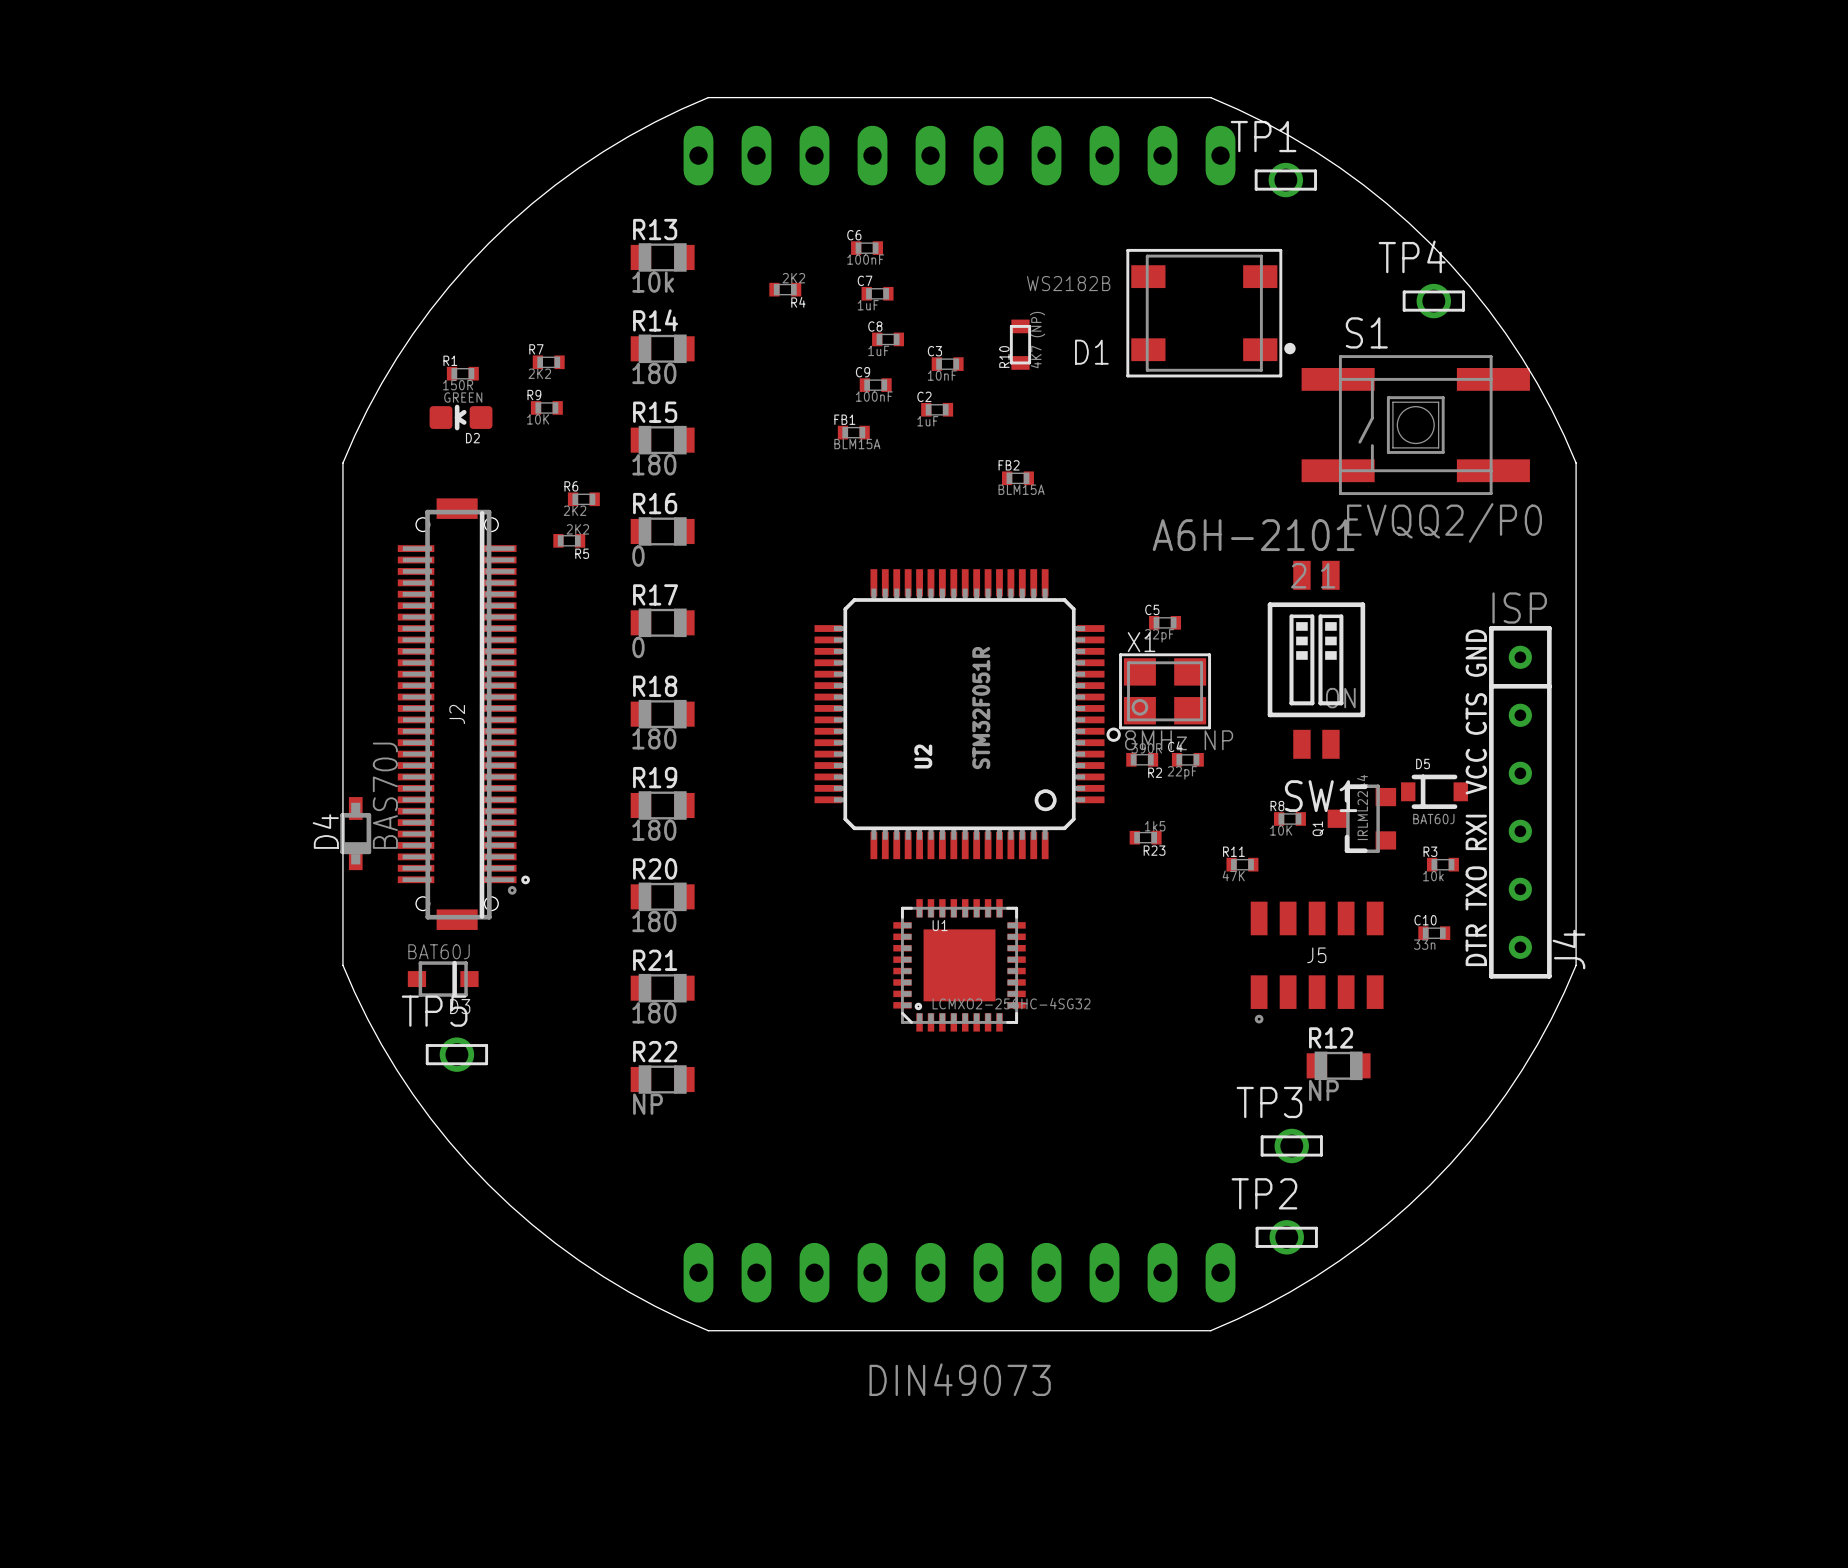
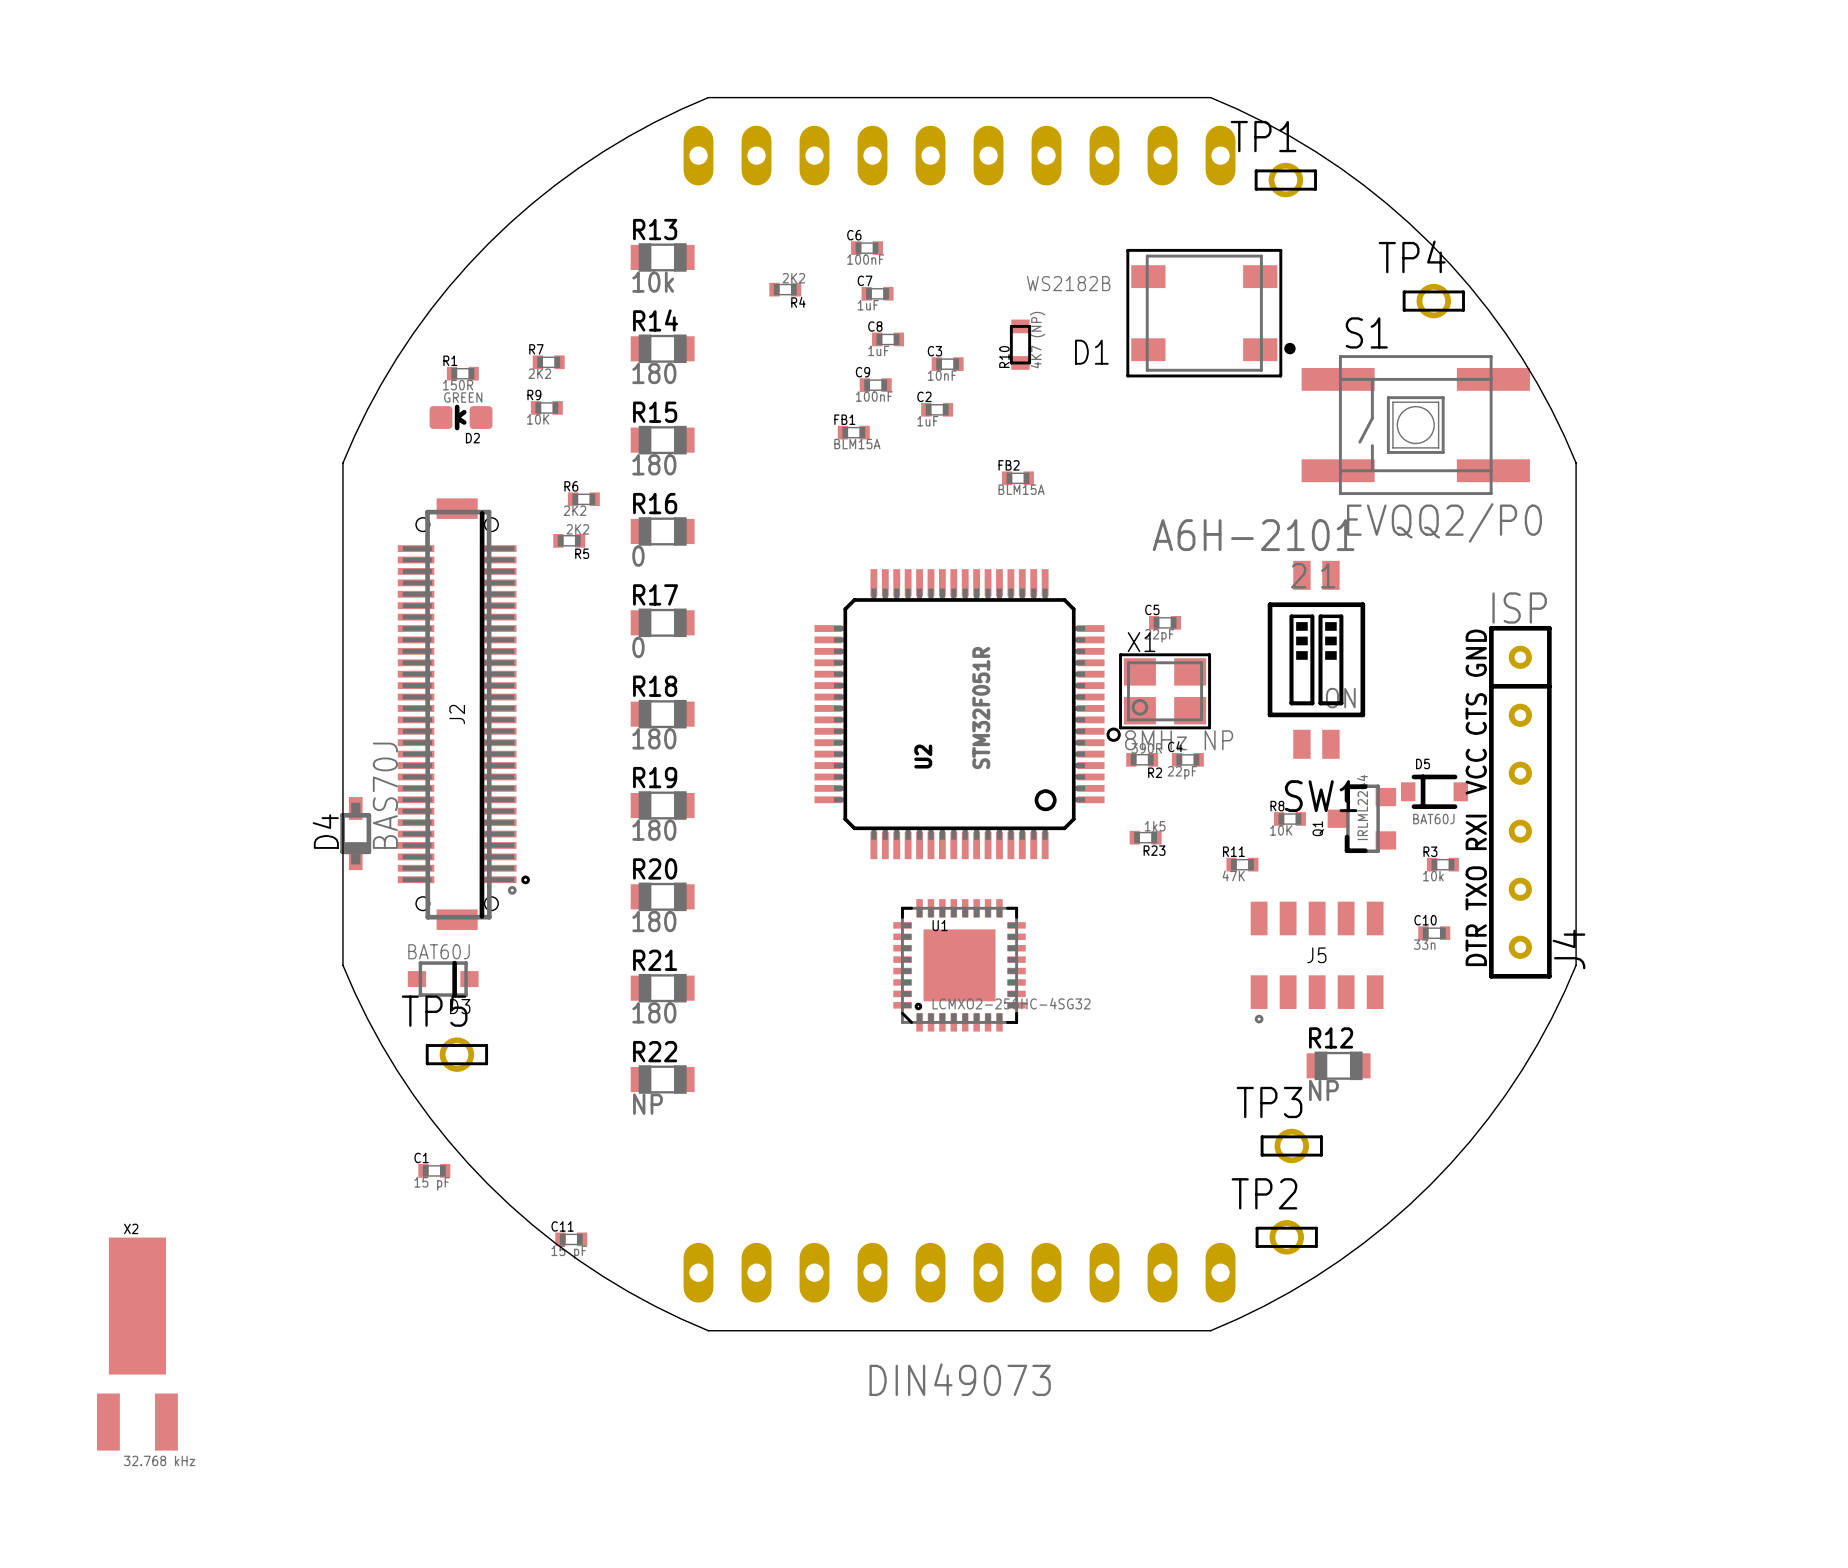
C1: none -> 15 pF (434, 1170)
C11: none -> 15 pF (571, 1239)
X2: none -> 32.768 kHz (137, 1344)

